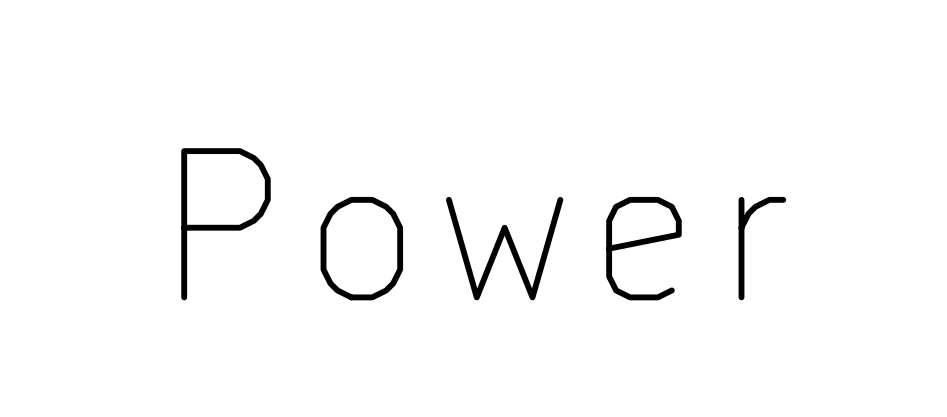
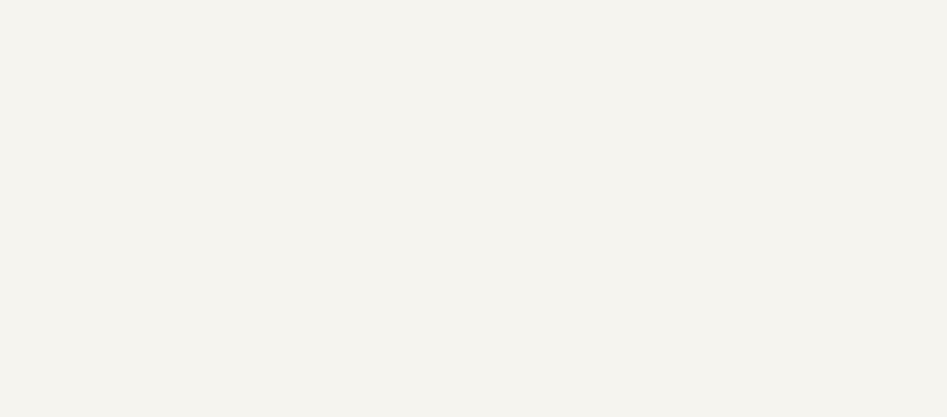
text: Power (483, 224) -> none

